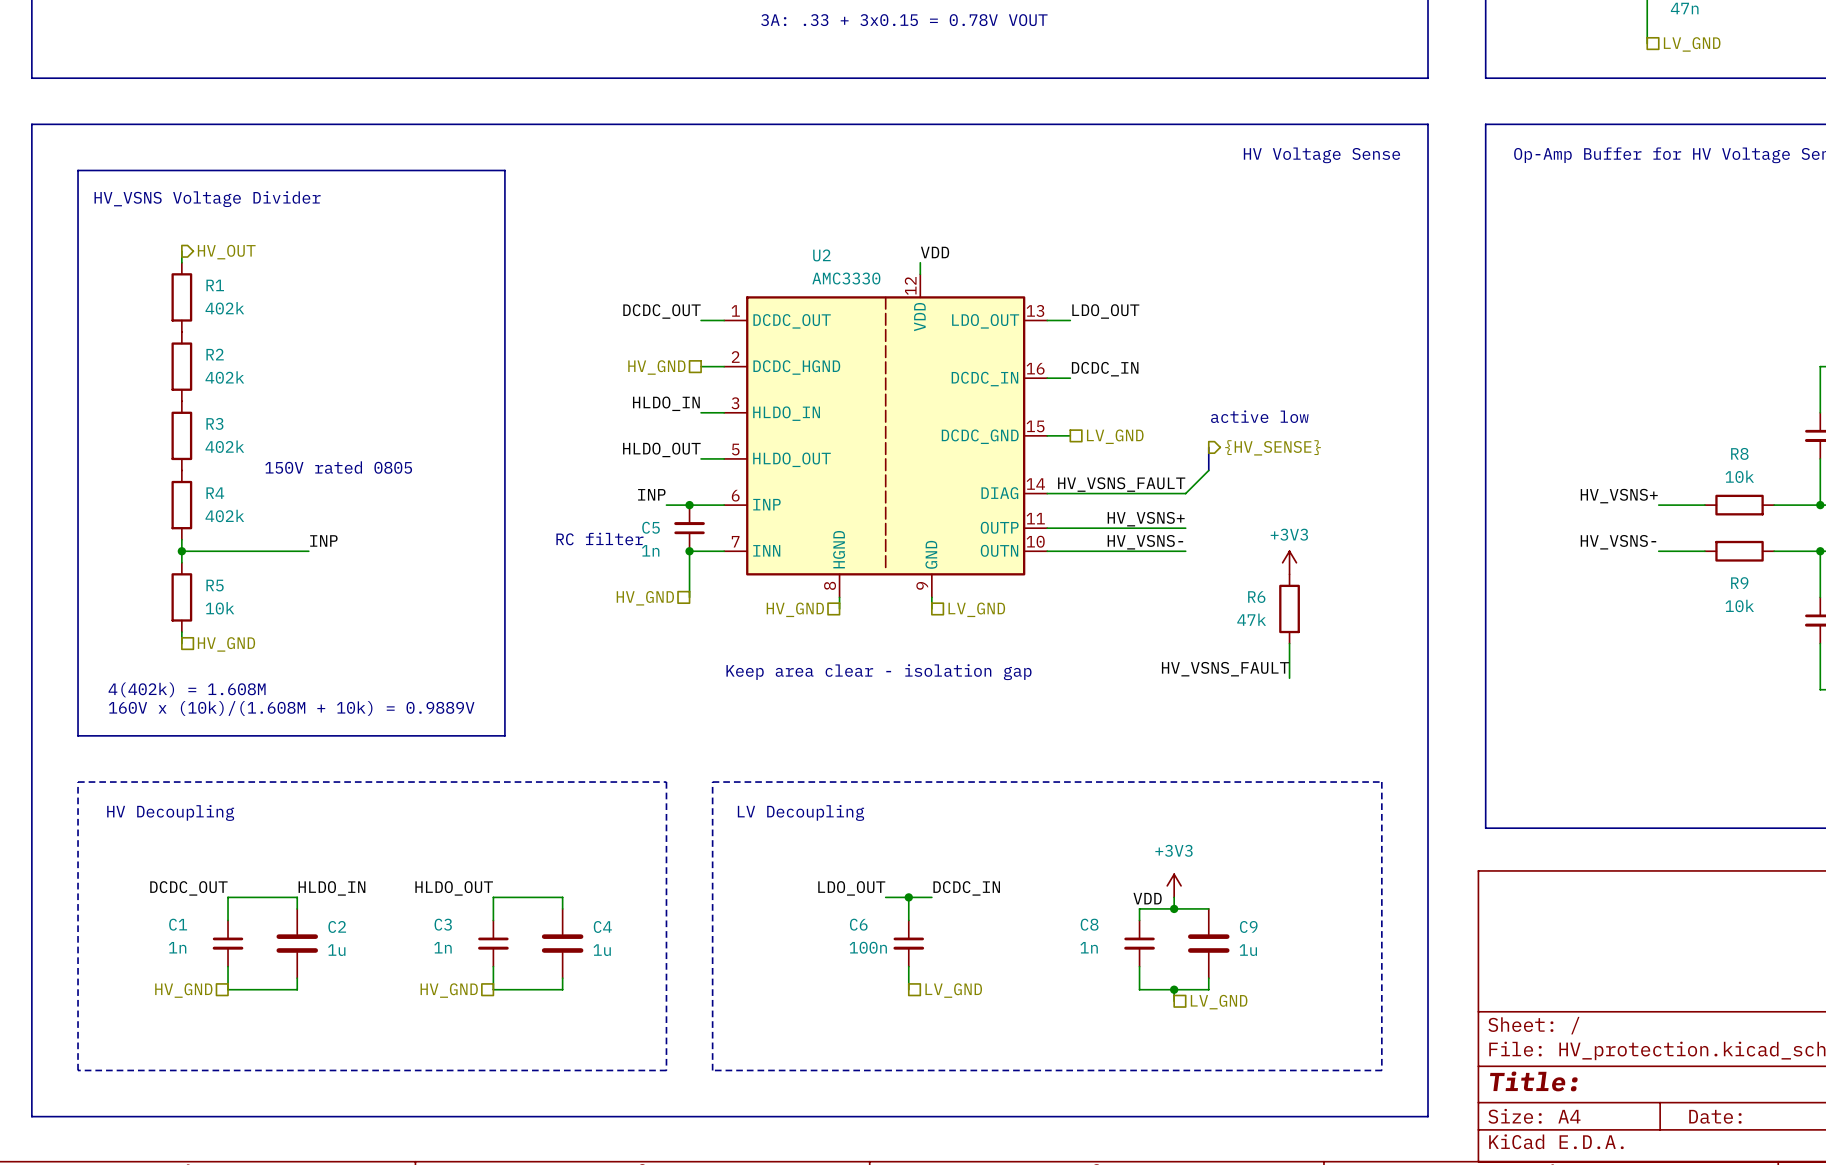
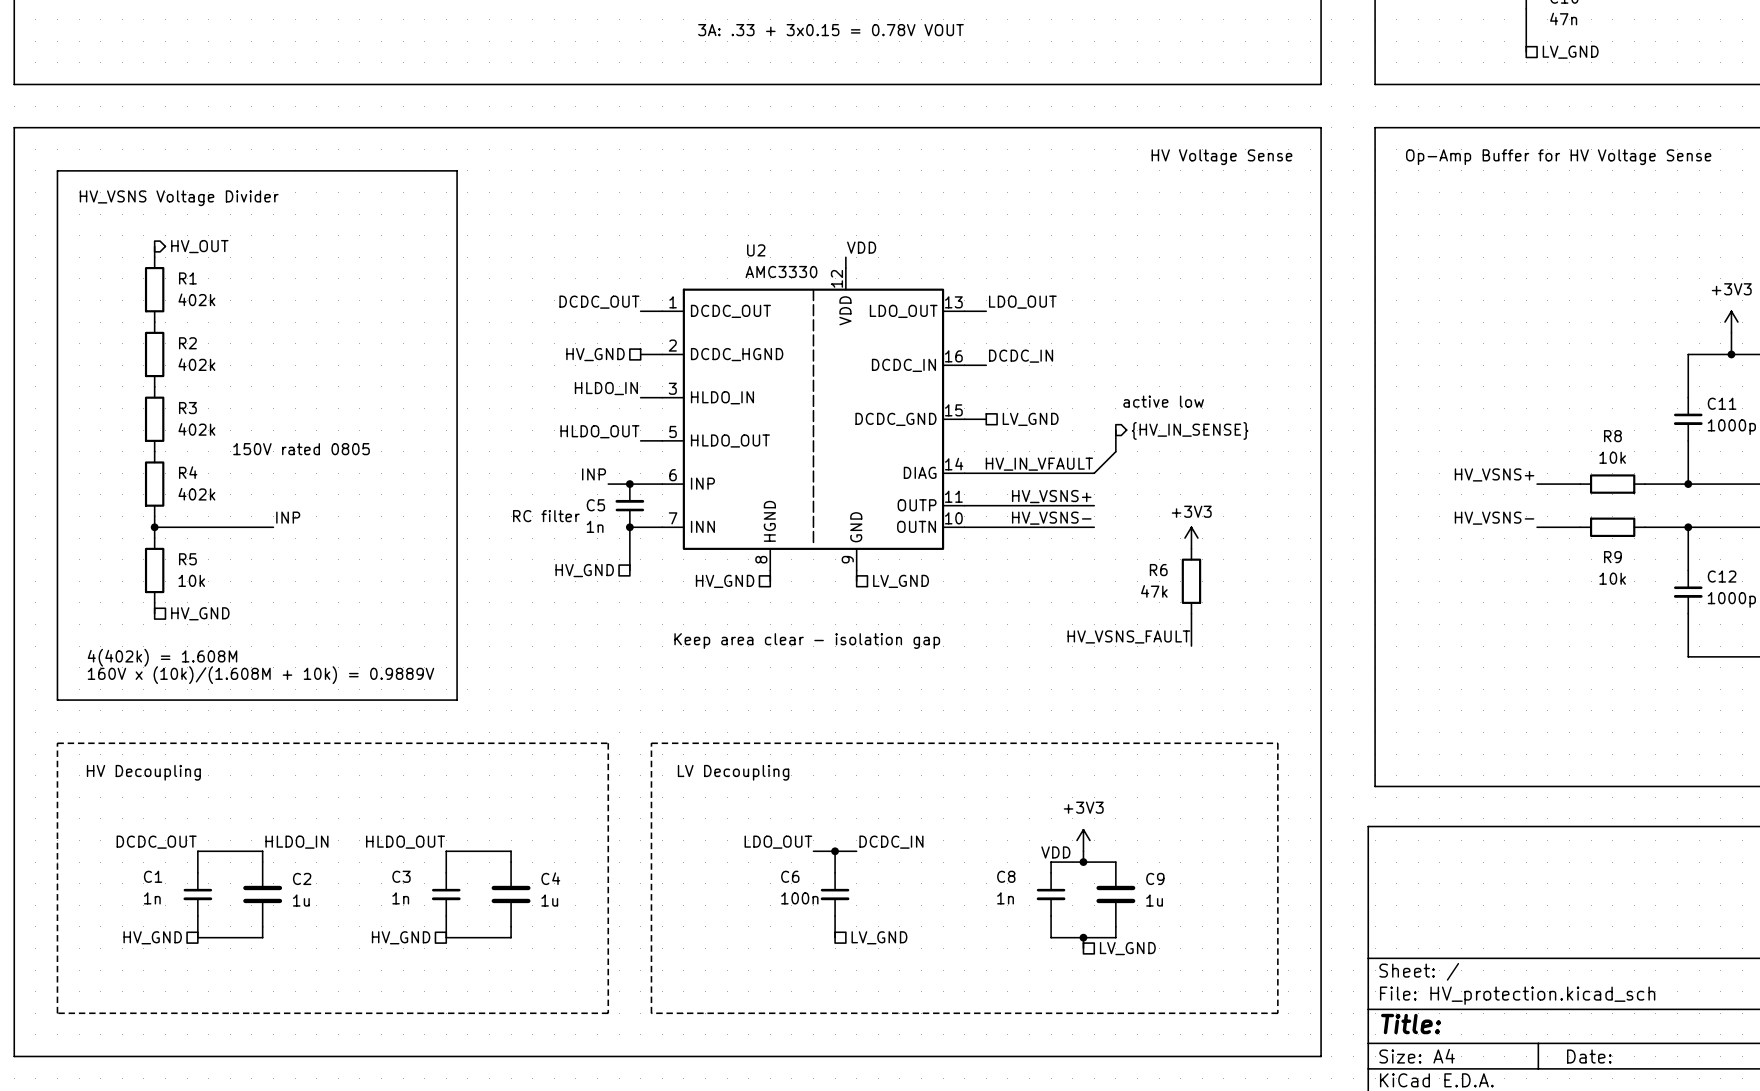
hierarchical label: {HV_SENSE} (1273, 447) -> {HV_IN_SENSE} (1190, 430)
label: HV_VSNS_FAULT (1121, 484) -> HV_IN_VFAULT (1039, 464)

